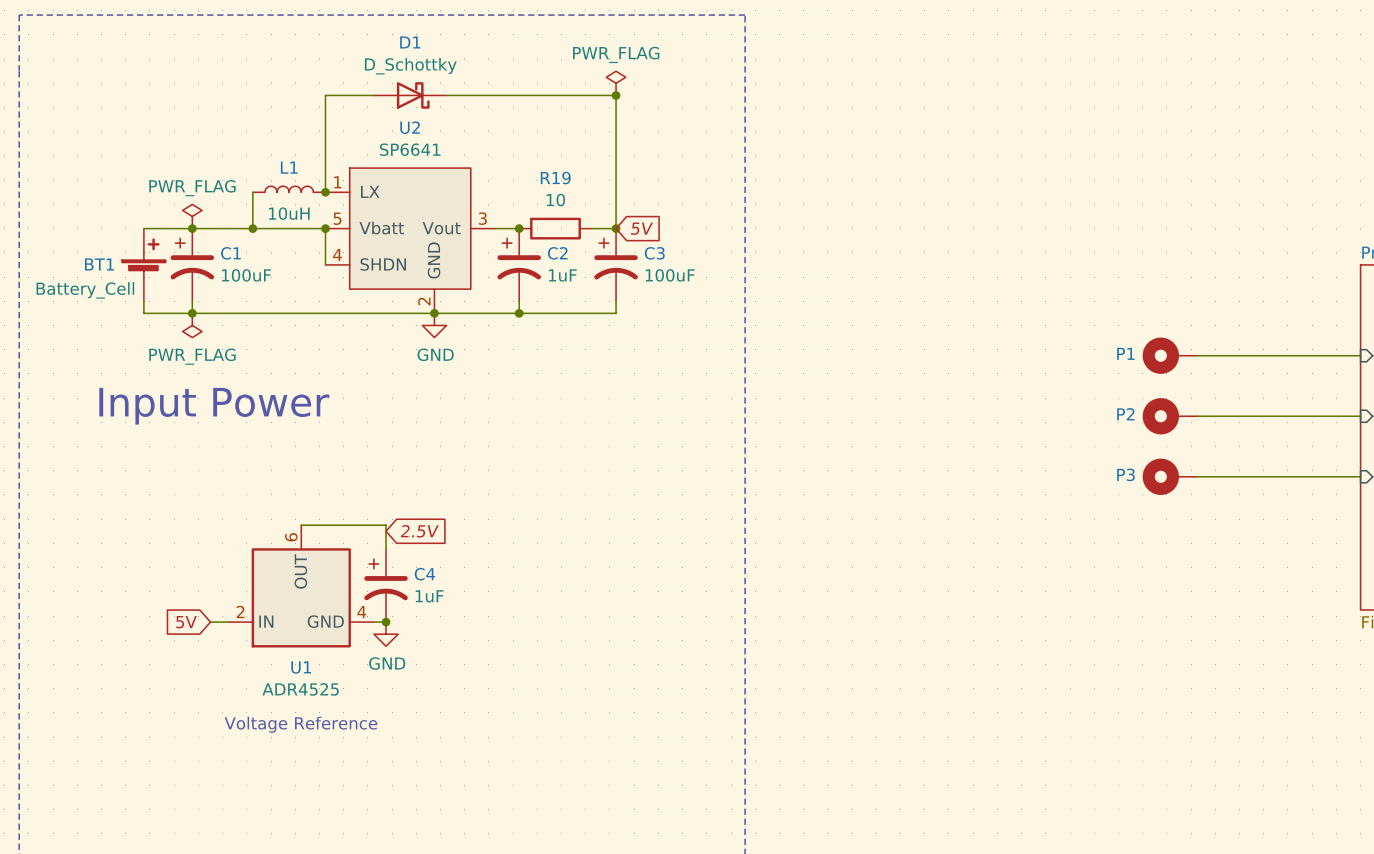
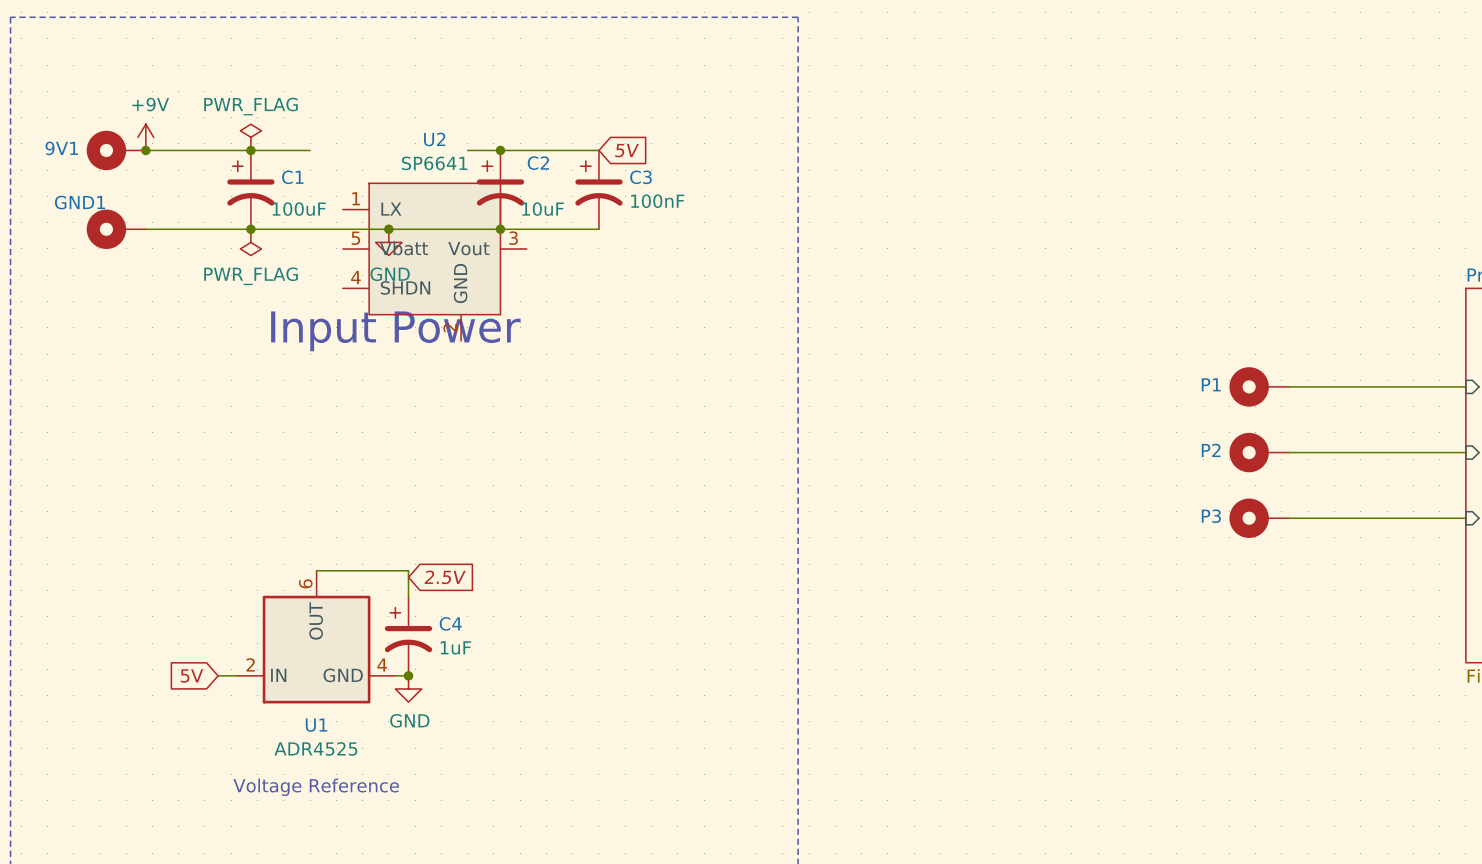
power symbol: PWR_FLAG (616, 83) -> none
wire: (373, 95) (325, 95) (325, 192) -> none
D1: D_Schottky (410, 95) -> none
wire: (446, 95) (616, 95) (616, 228) (591, 228) -> none
junction: (616, 95) -> none
power symbol: none -> +9V (145, 137)
power symbol: none -> PWR_FLAG (250, 137)
9V1: none -> (116, 150)
wire: none -> (145, 150) (310, 150)
junction: none -> (145, 150)
junction: none -> (250, 150)
wire: none -> (467, 150) (598, 150)
junction: none -> (500, 150)
L1: 10uH (289, 189) -> none
wire: (252, 192) (252, 228) -> none
junction: (325, 192) -> none
GND1: none -> (116, 229)
wire: none -> (145, 229) (598, 229)
junction: none -> (388, 229)
junction: none -> (500, 229)
power symbol rotation: 0° (192, 216) -> 180° (250, 242)
power symbol position: PWR_FLAG (192, 216) -> PWR_FLAG (250, 242)
wire: (143, 228) (325, 228) (325, 264) -> none
junction: (192, 228) -> none
junction position: (252, 228) -> (250, 229)
junction: (325, 228) -> none
wire: (494, 228) (519, 228) -> none
junction: (519, 228) -> none
R19: 10 (555, 228) -> none
junction: (616, 228) -> none
global label position: 5V (641, 228) -> 5V (627, 150)
C2 name position: C2 (557, 253) -> C2 (538, 163)
BT1: Battery_Cell (143, 264) -> none
C1 position: (192, 264) -> (250, 189)
C2 position: (519, 264) -> (500, 189)
C3 position: (616, 264) -> (598, 189)
C1 value position: 100uF (246, 275) -> 100uF (299, 209)
C2 value: 1uF (562, 275) -> 10uF (542, 209)
C3 value: 100uF (670, 275) -> 100nF (657, 201)
wire: (143, 301) (143, 313) (616, 313) (616, 301) -> none
wire: (192, 301) (192, 313) -> none
wire: (519, 301) (519, 313) -> none
junction: (192, 313) -> none
junction: (434, 313) -> none
junction: (519, 313) -> none
power symbol: PWR_FLAG (192, 325) -> none
power symbol position: GND (434, 325) -> GND (388, 242)
text position: Input Power (214, 406) -> Input Power (395, 331)

